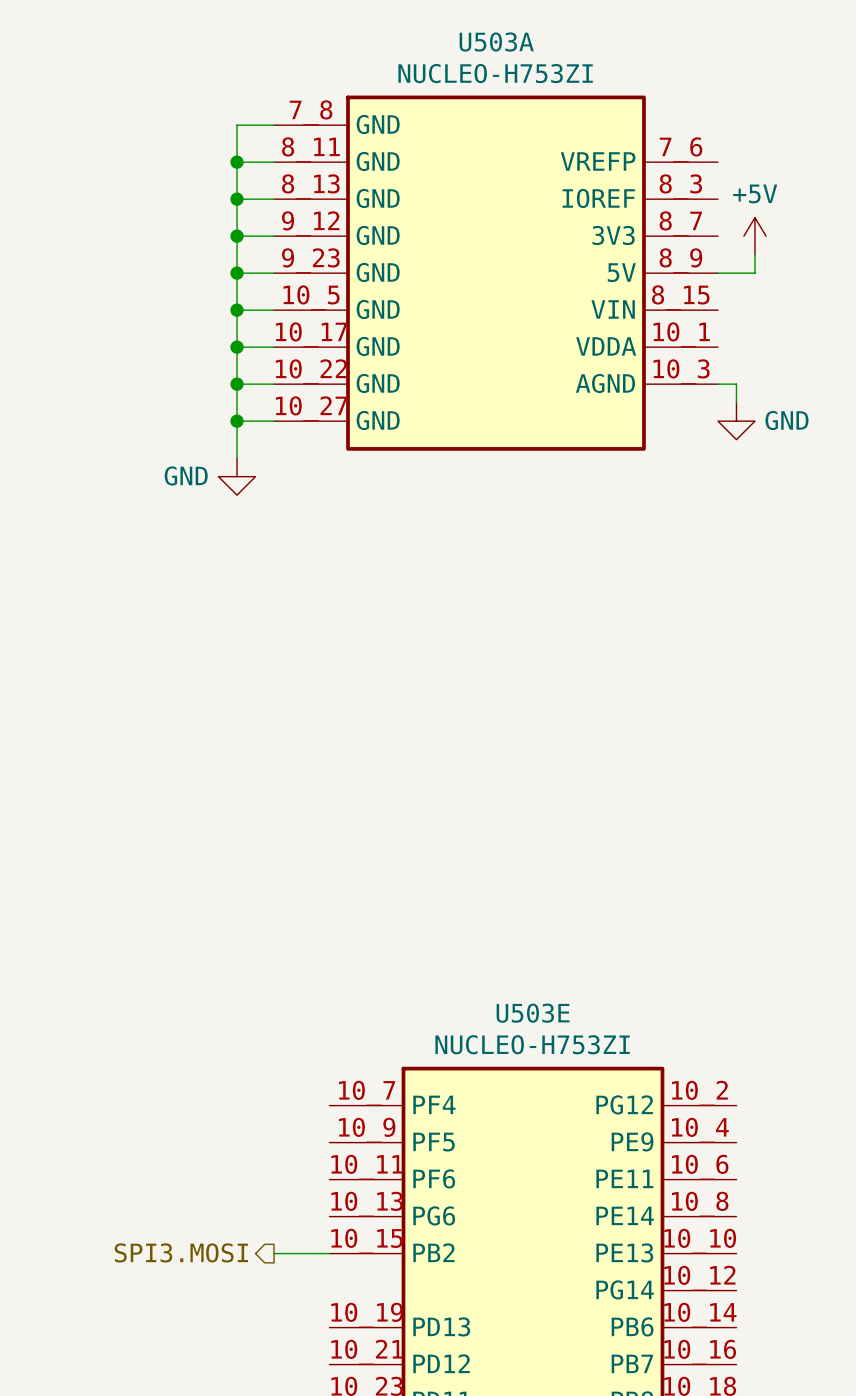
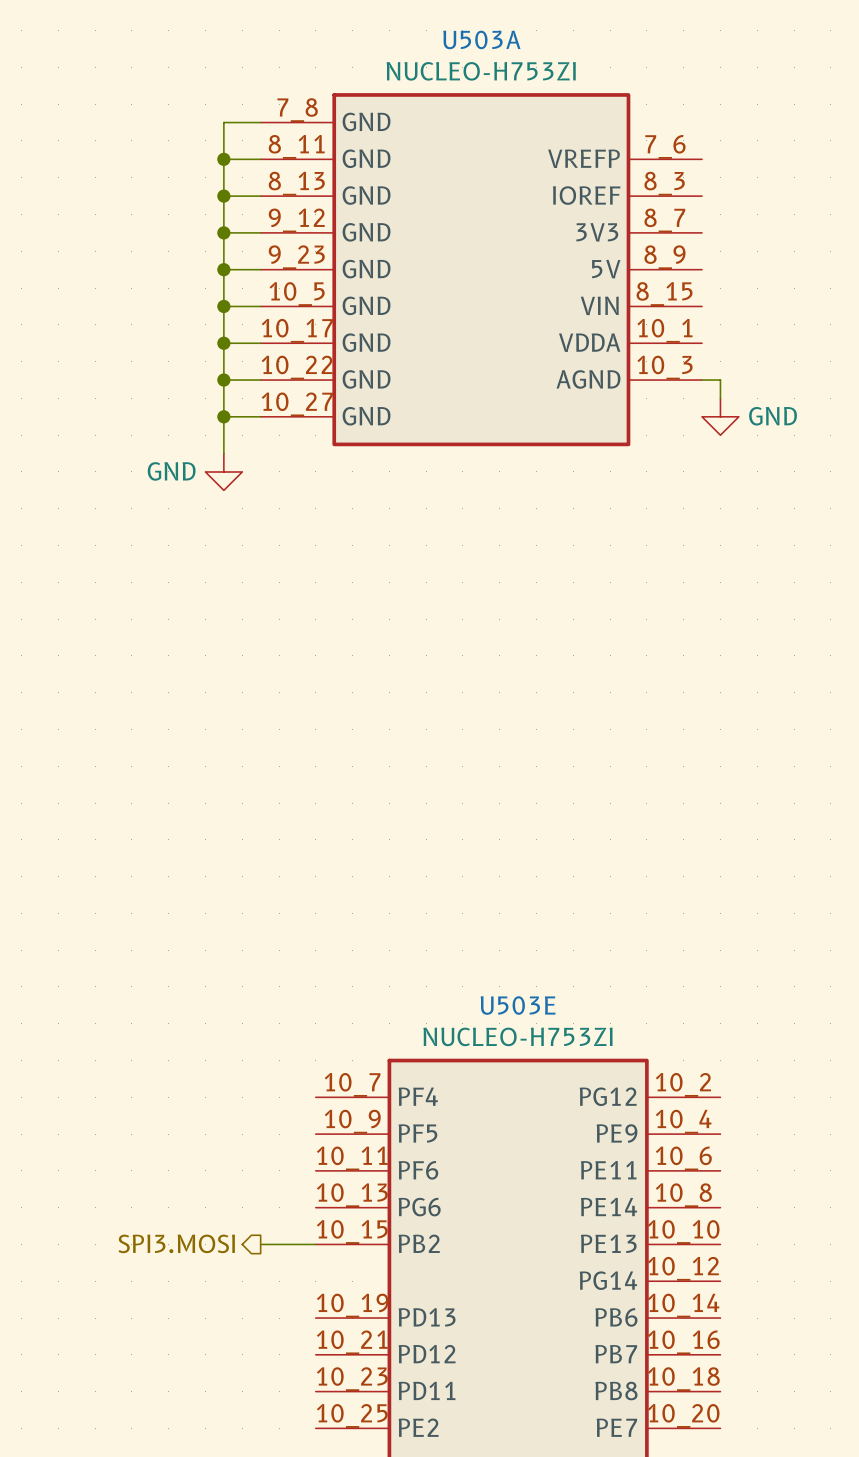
power symbol: +5V (754, 236) -> none
wire: (754, 254) (754, 273) (717, 273) -> none

